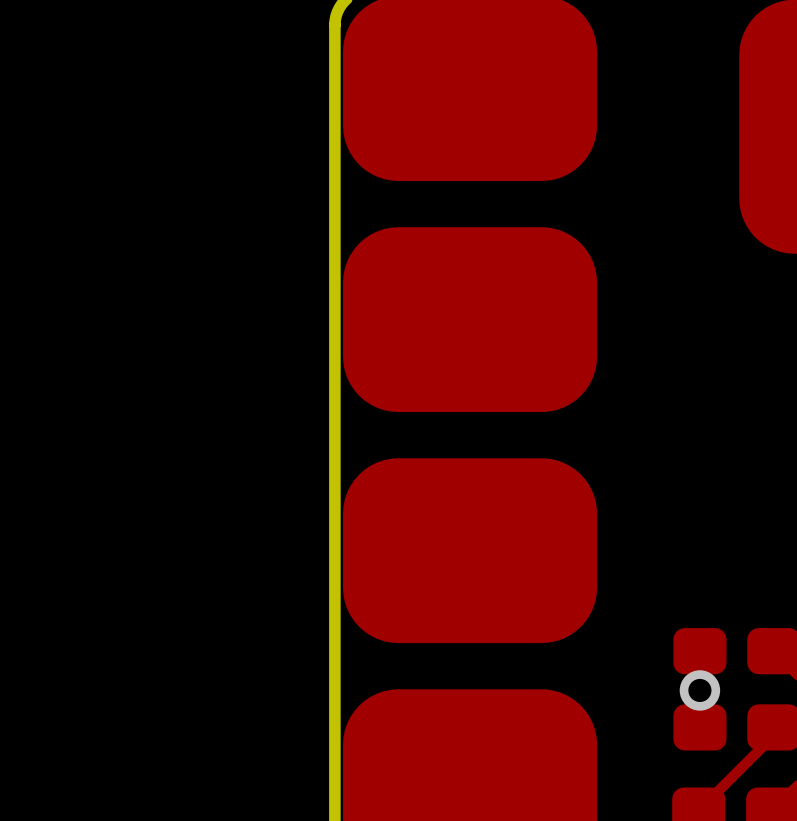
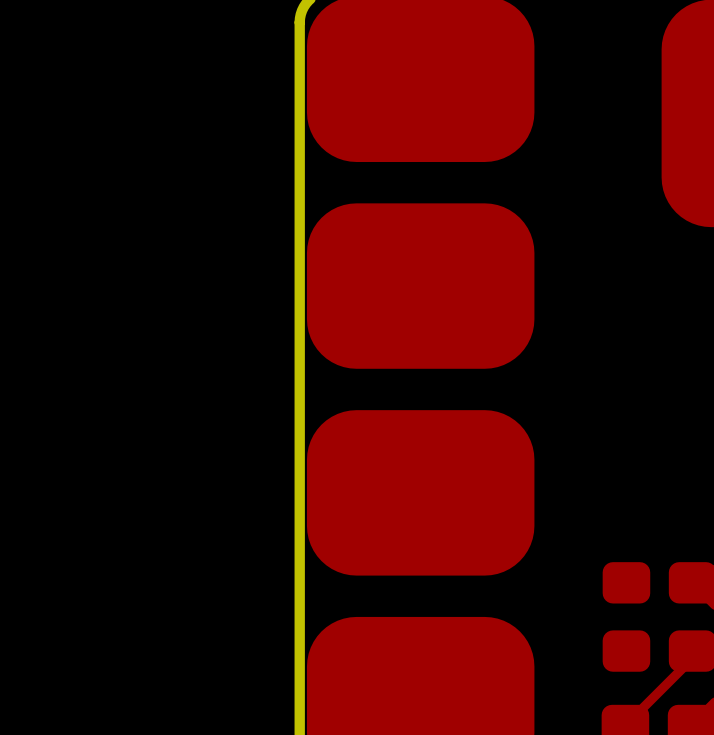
via: (699, 690) -> none

